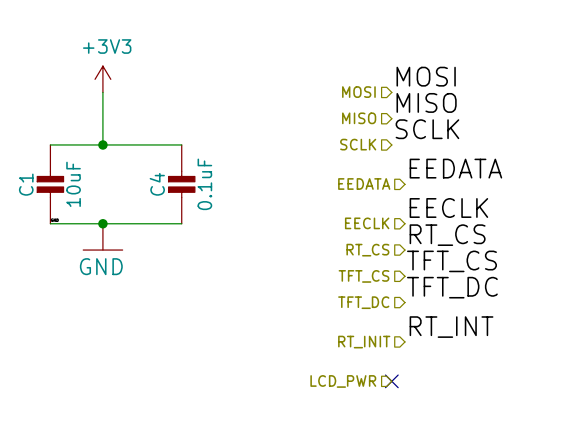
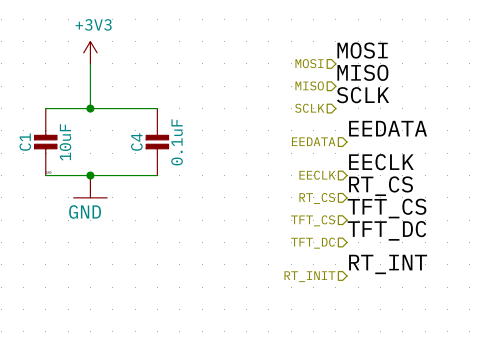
hierarchical label: LCD_PWR (343, 381) -> none
no-connect mark: (391, 381) -> none

